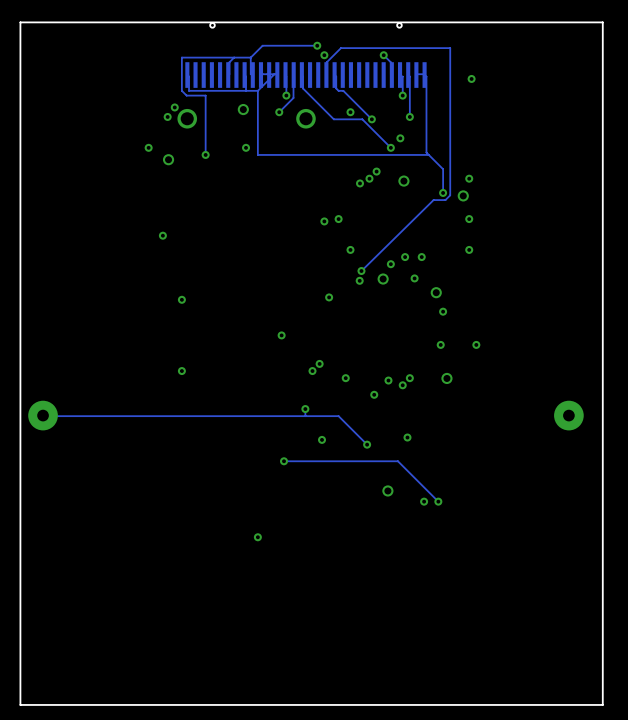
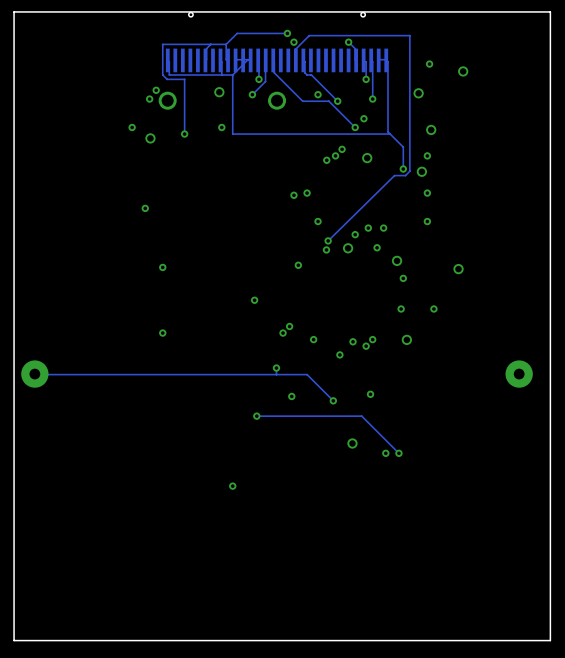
via: none -> (463, 71)
via: none -> (418, 93)
via: none -> (431, 129)
via: none -> (458, 269)

